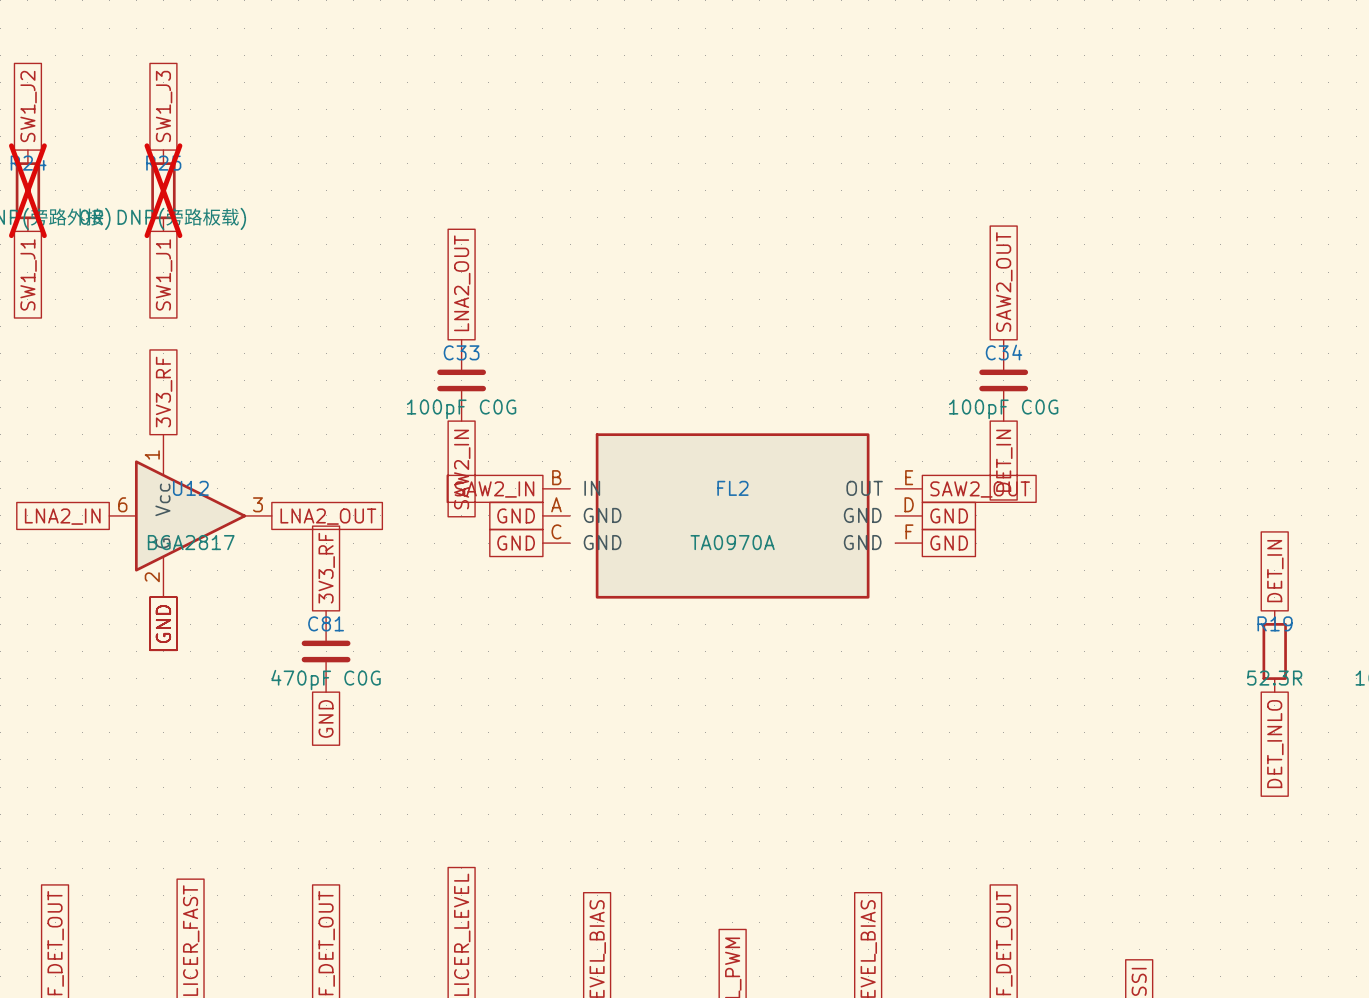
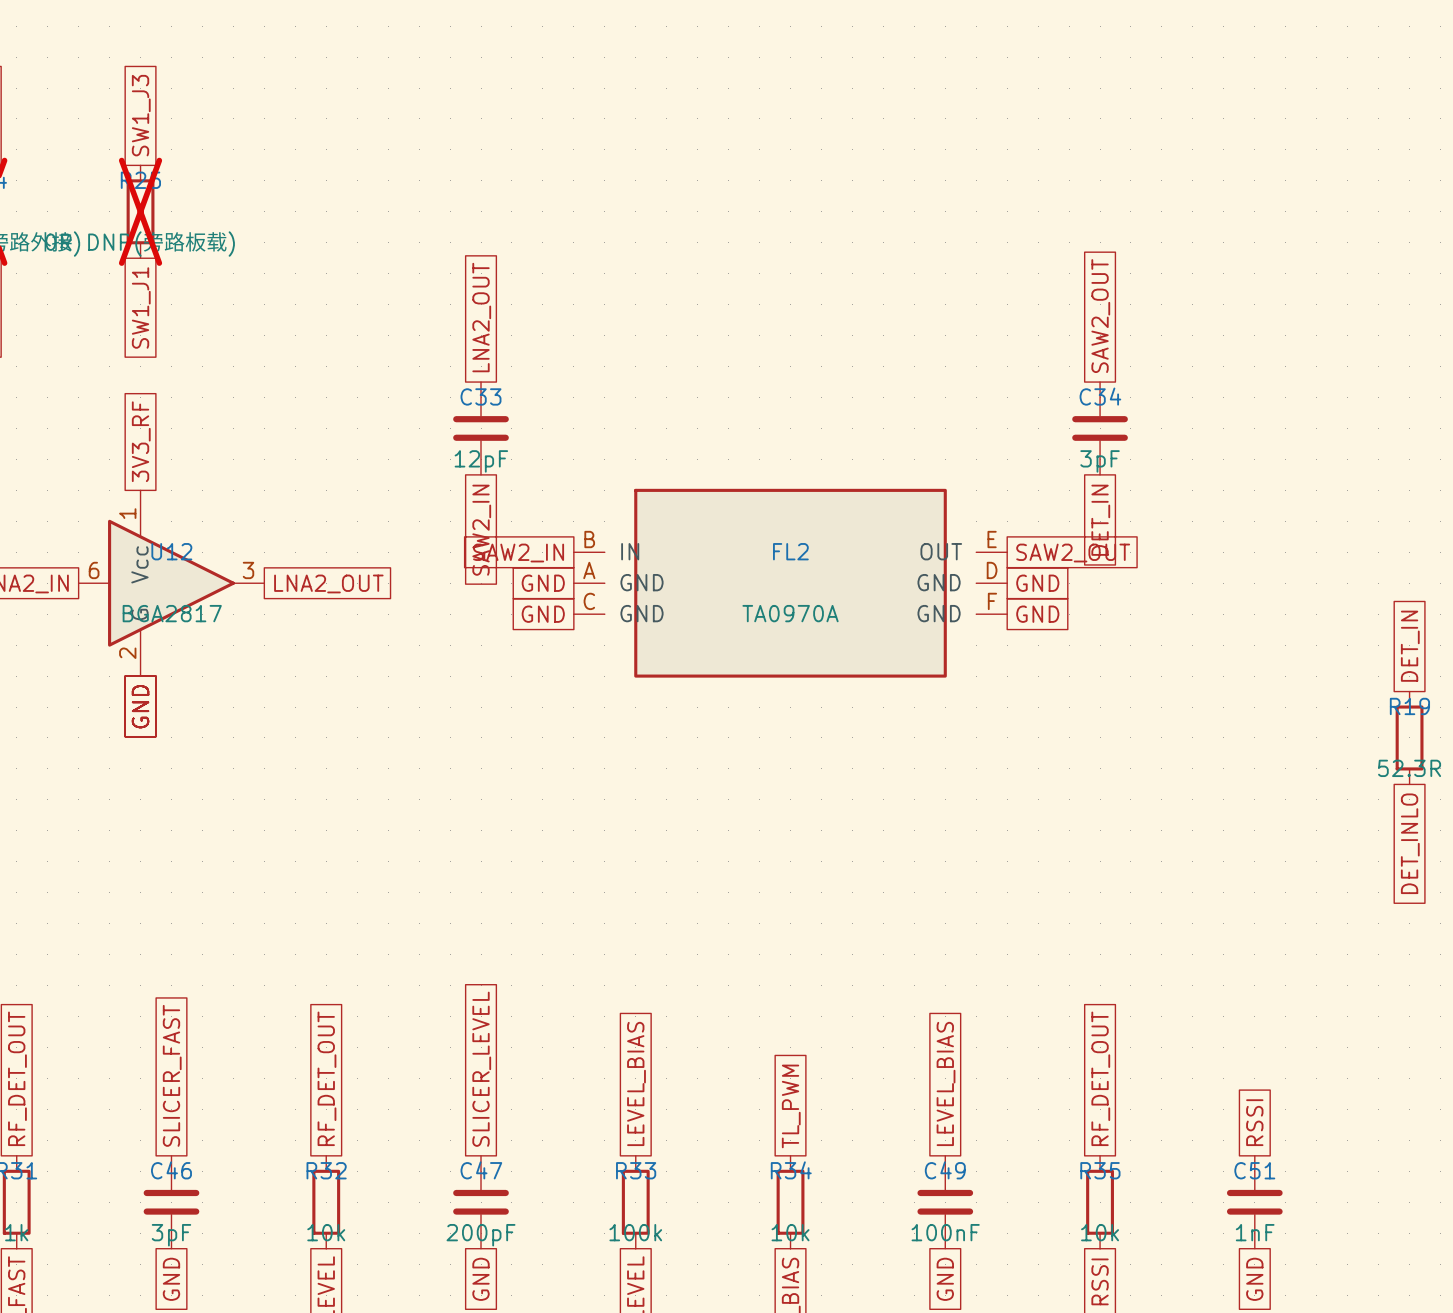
C33 value: 100pF C0G (461, 409) -> 12pF (481, 461)
C34 value: 100pF C0G (1003, 409) -> 3pF (1100, 461)
global label: 3V3_RF (326, 568) -> none
C81: 470pF C0G (326, 651) -> none
global label: GND (326, 718) -> none

